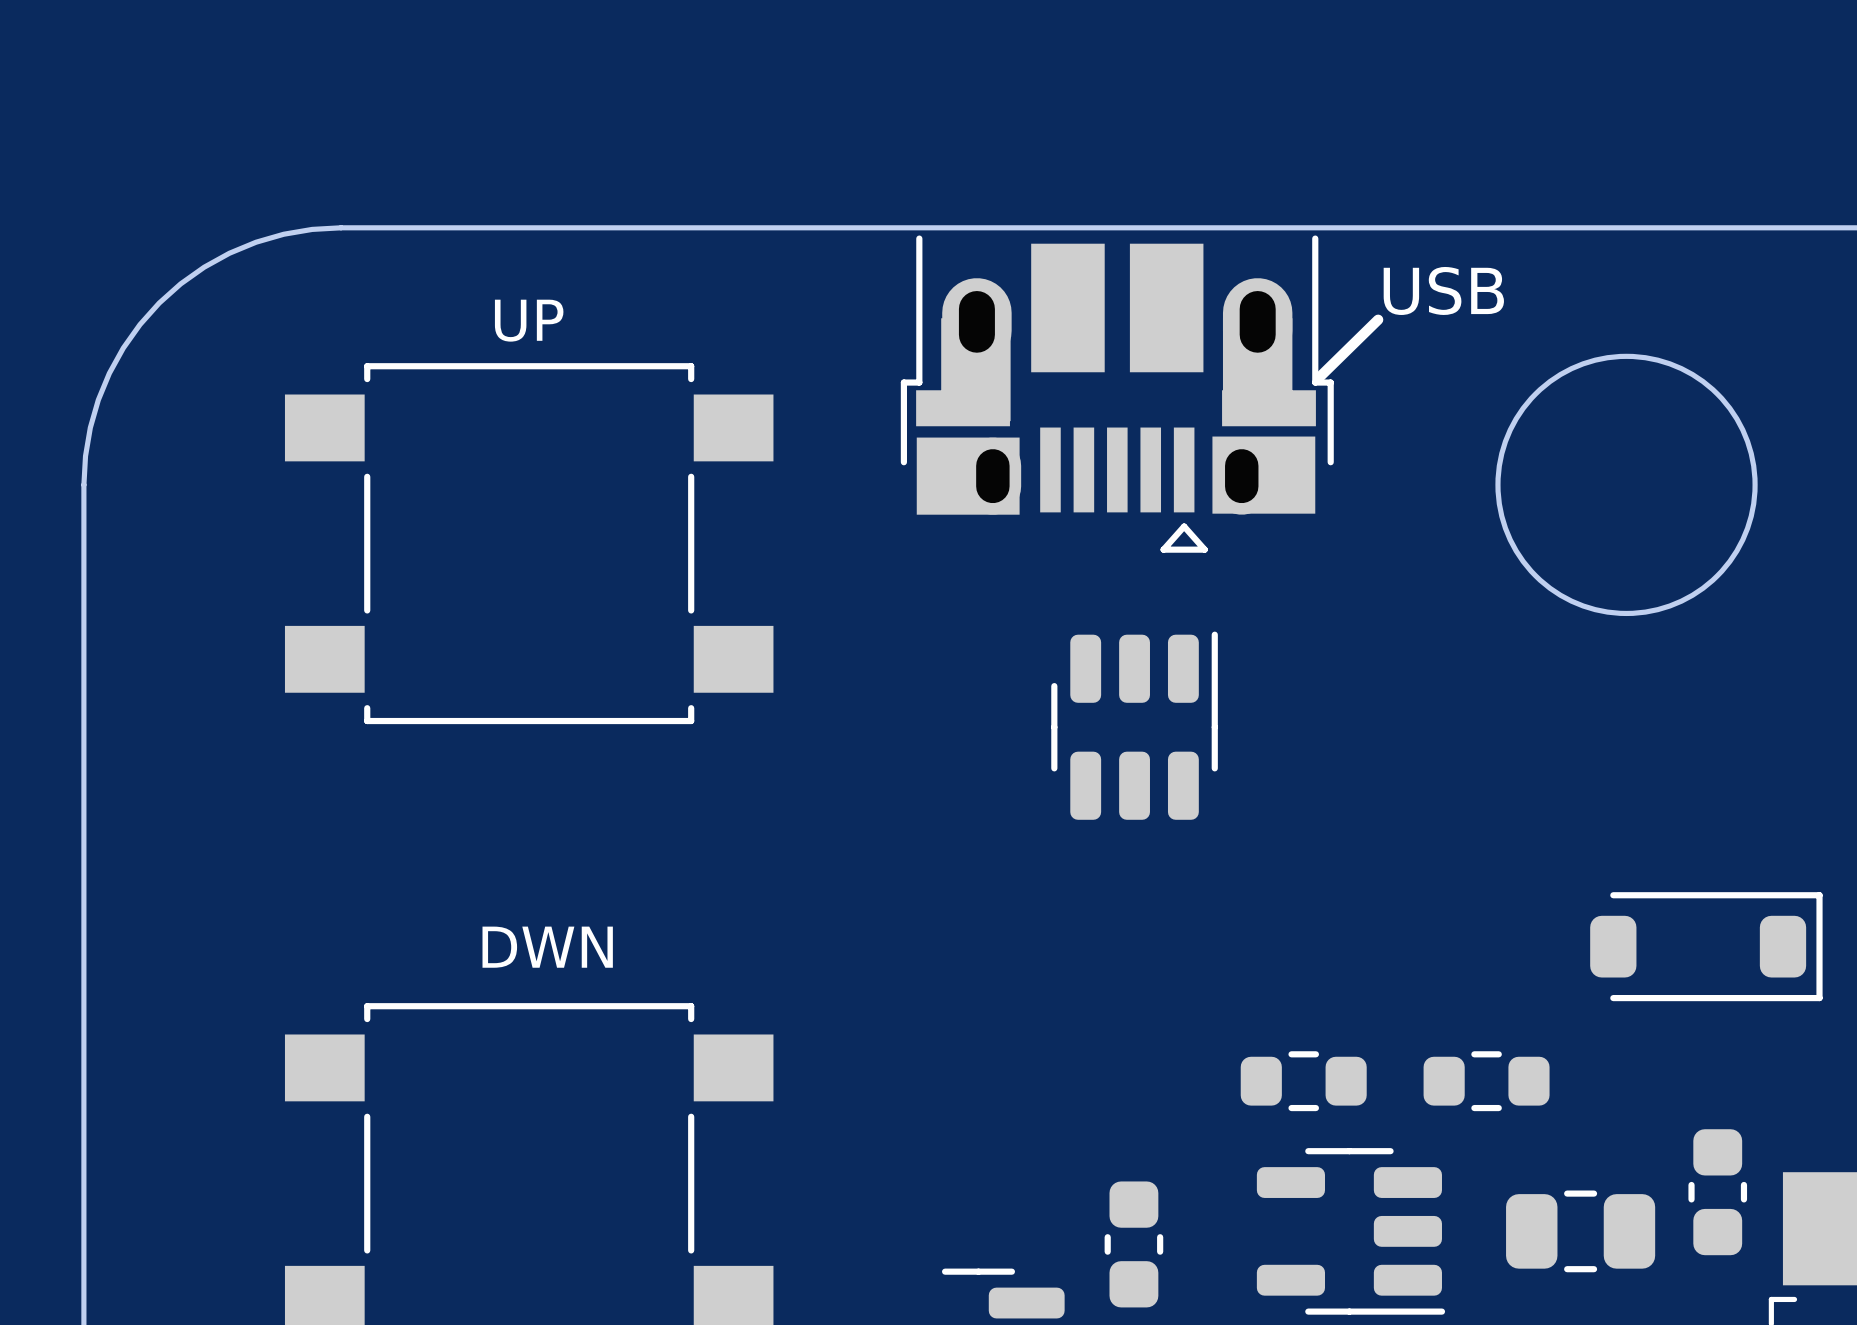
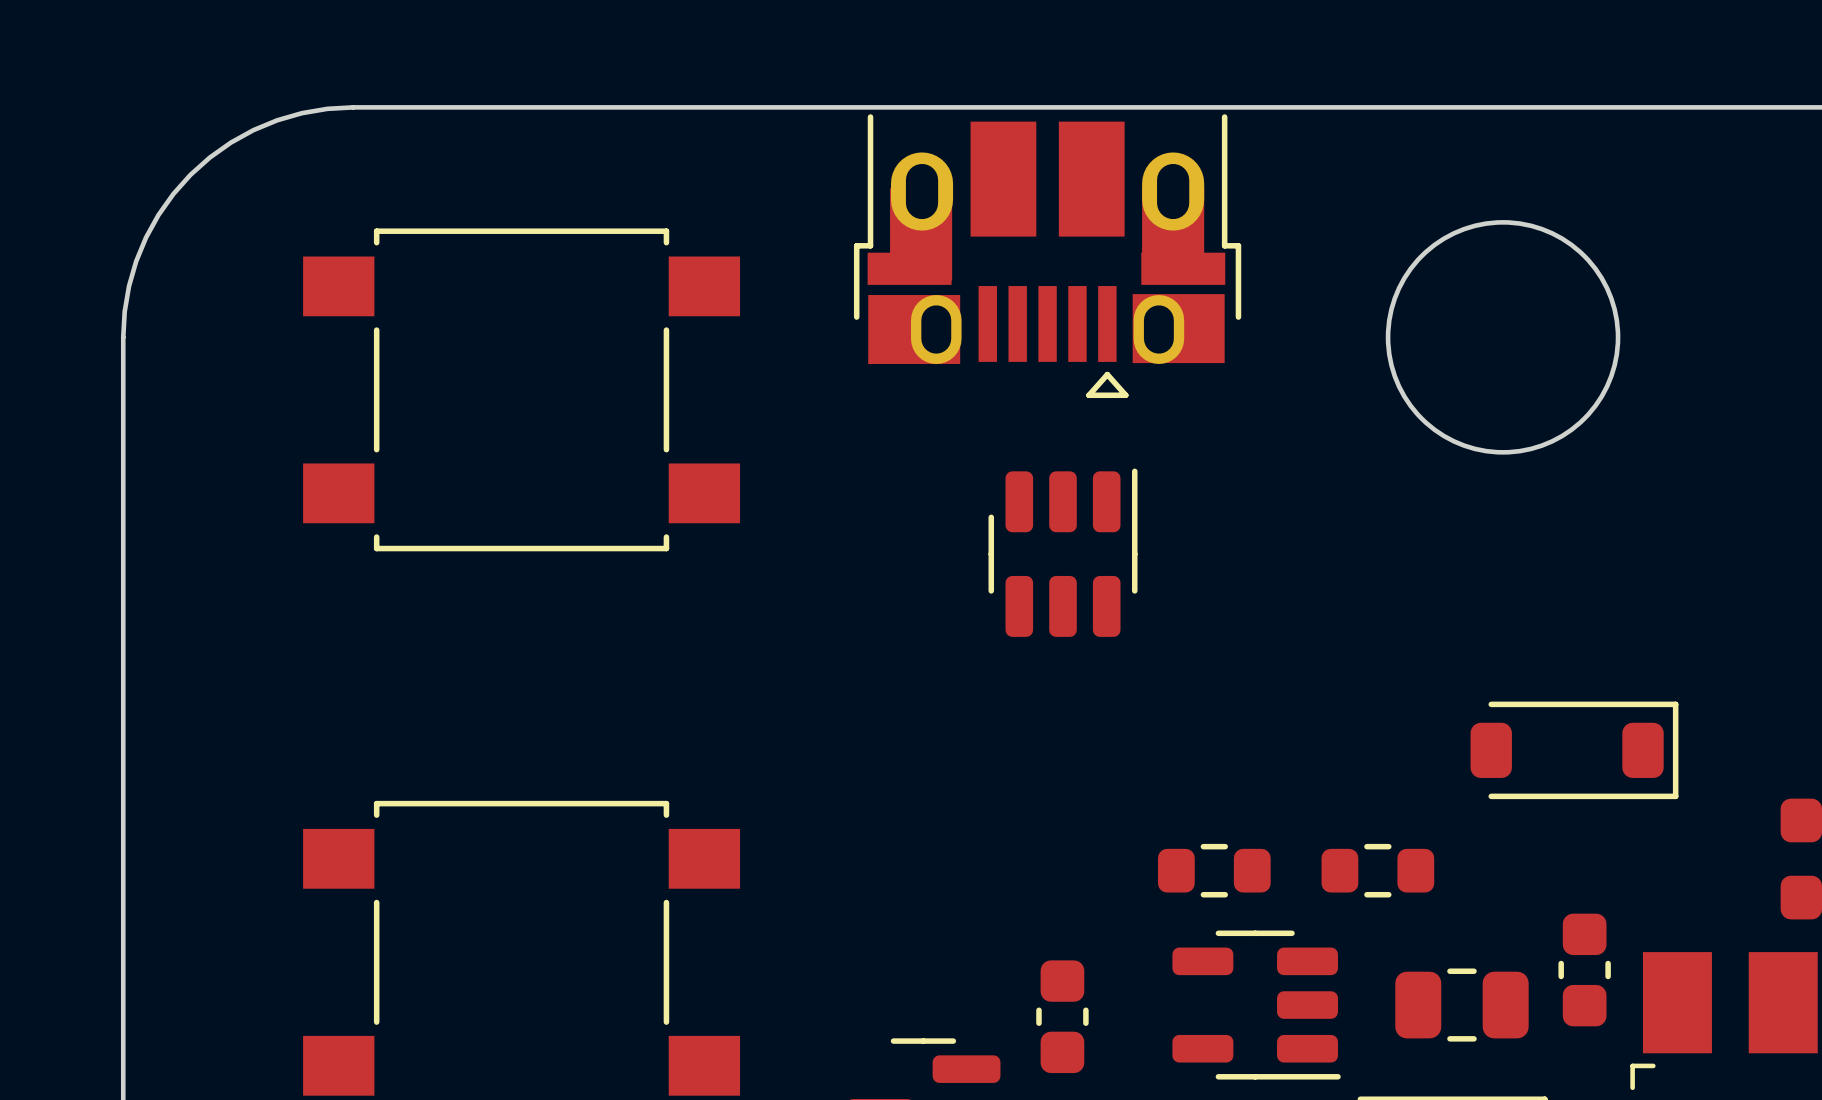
text: USB (1443, 290) -> none
line: (1378, 319) (1318, 378) -> none
text: UP (529, 320) -> none
text: DWN (547, 947) -> none

